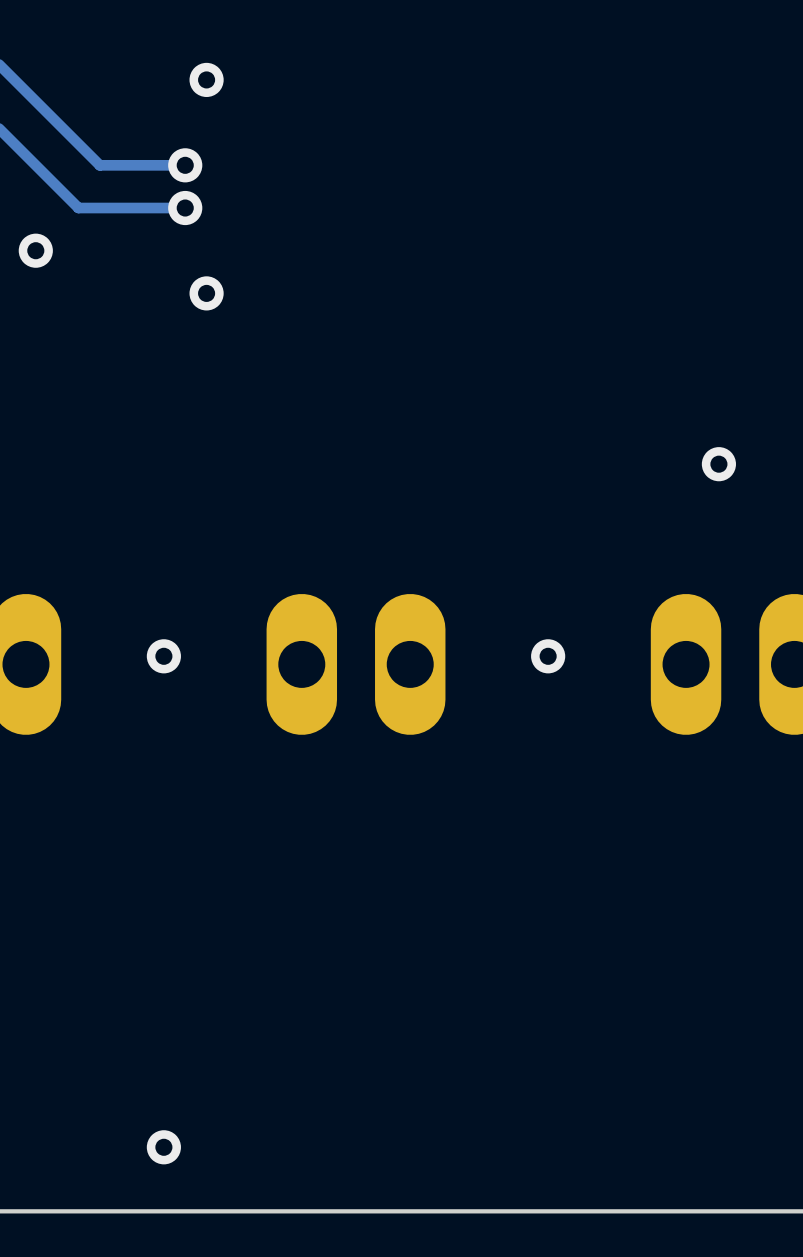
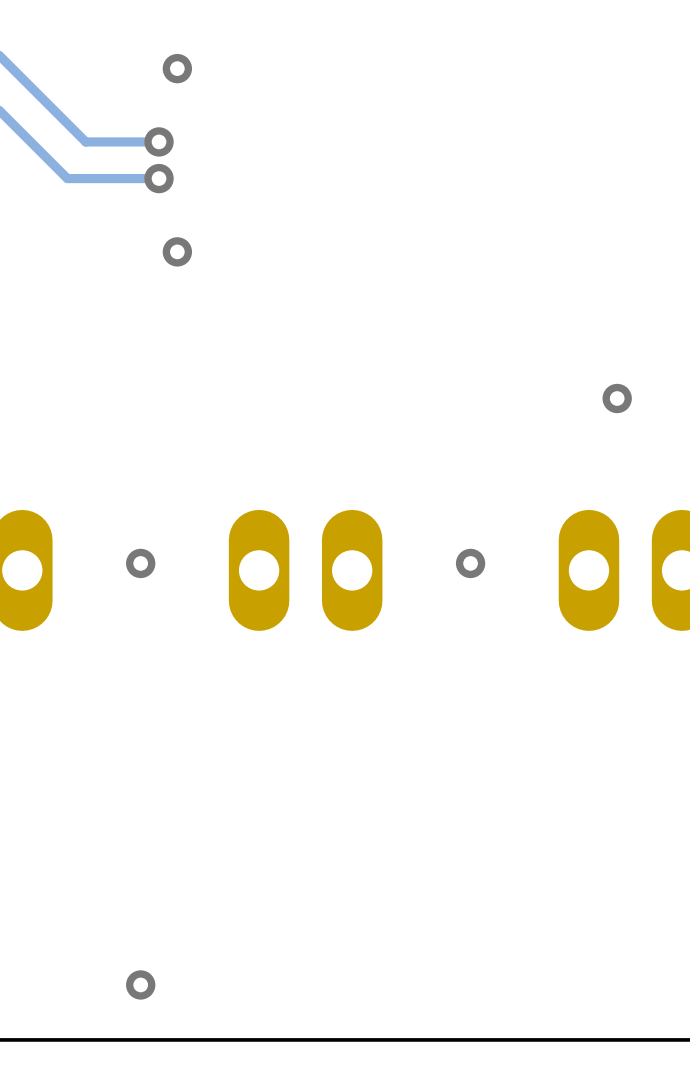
via: (35, 250) -> none

